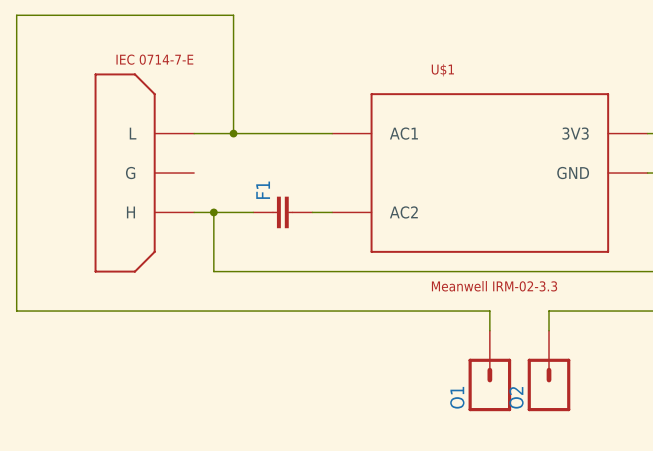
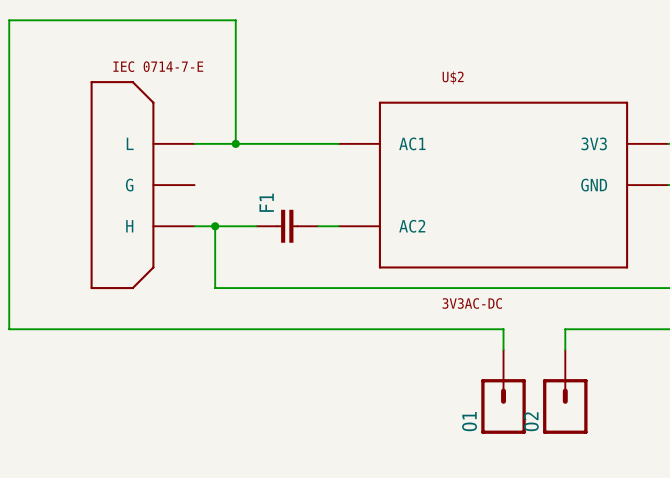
U$1 name: U$1 (442, 70) -> U$2 (453, 77)
U$1 value: Meanwell IRM-02-3.3 (494, 286) -> 3V3AC-DC (472, 303)

